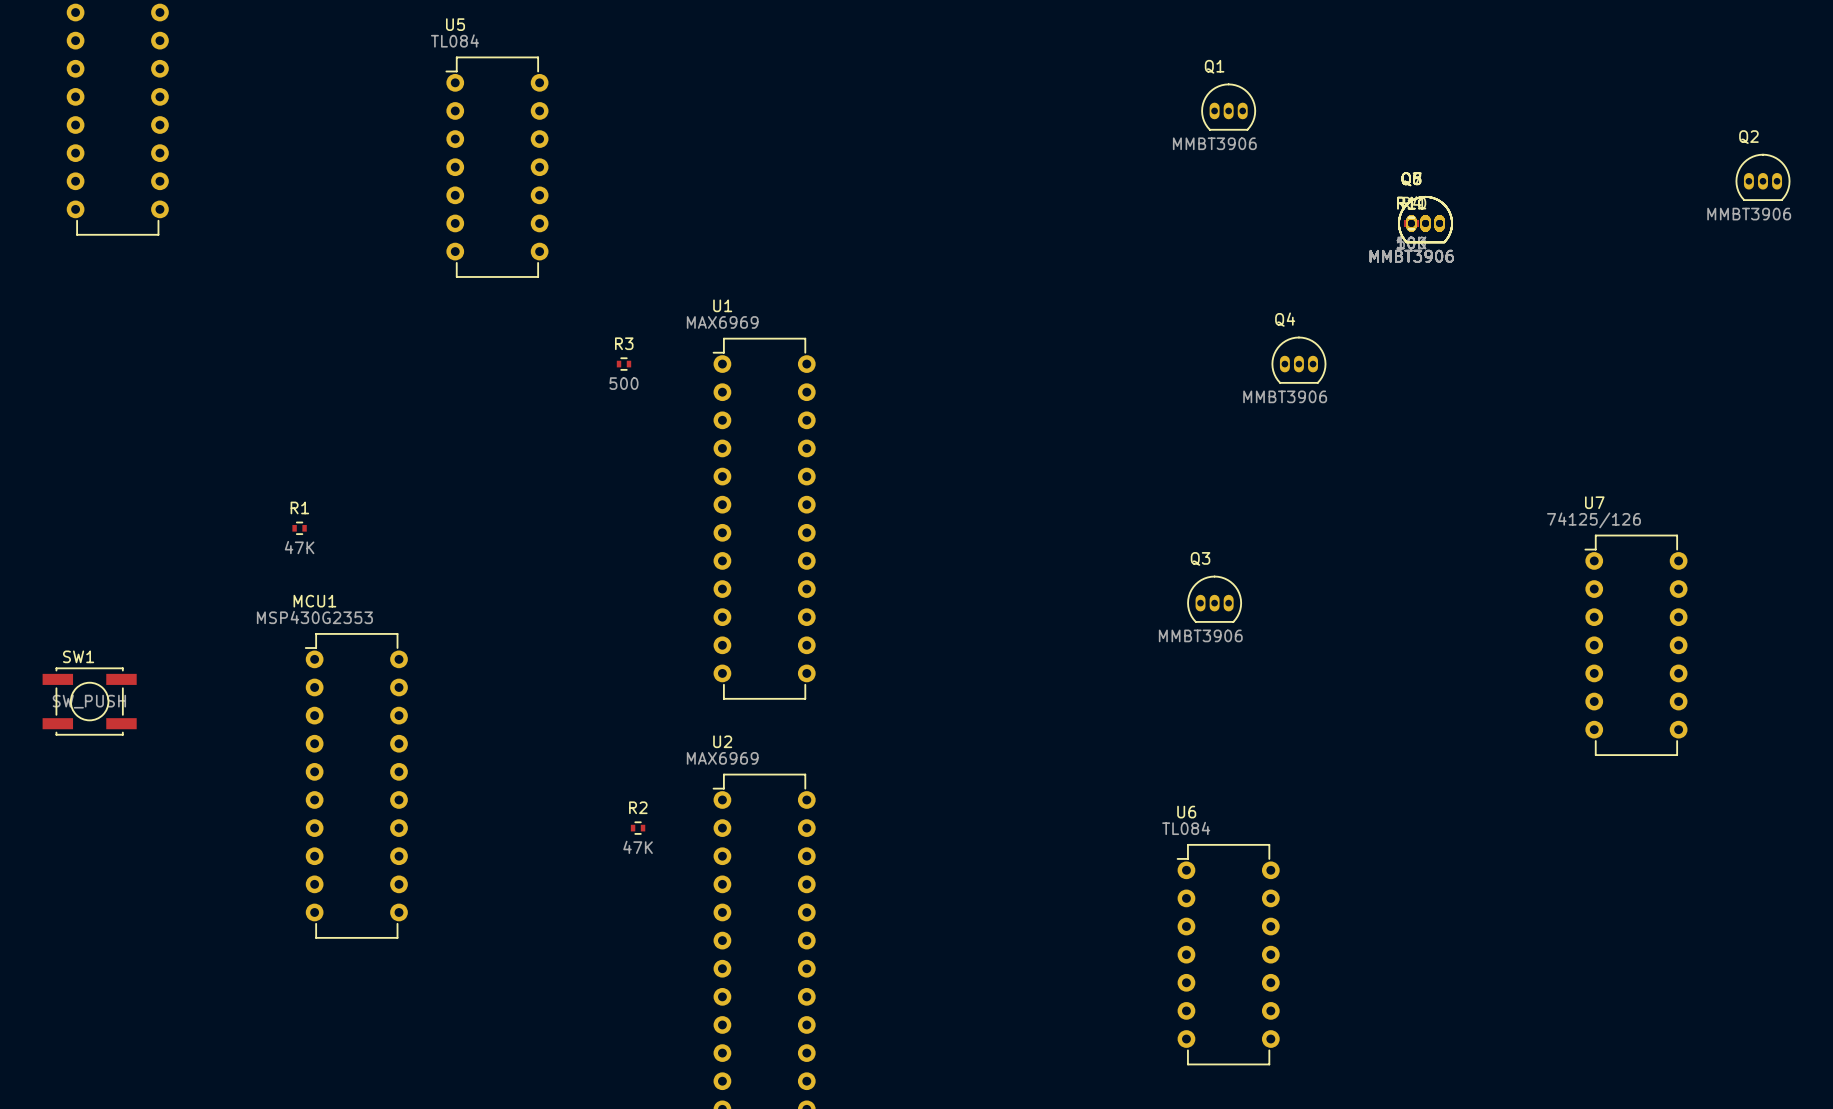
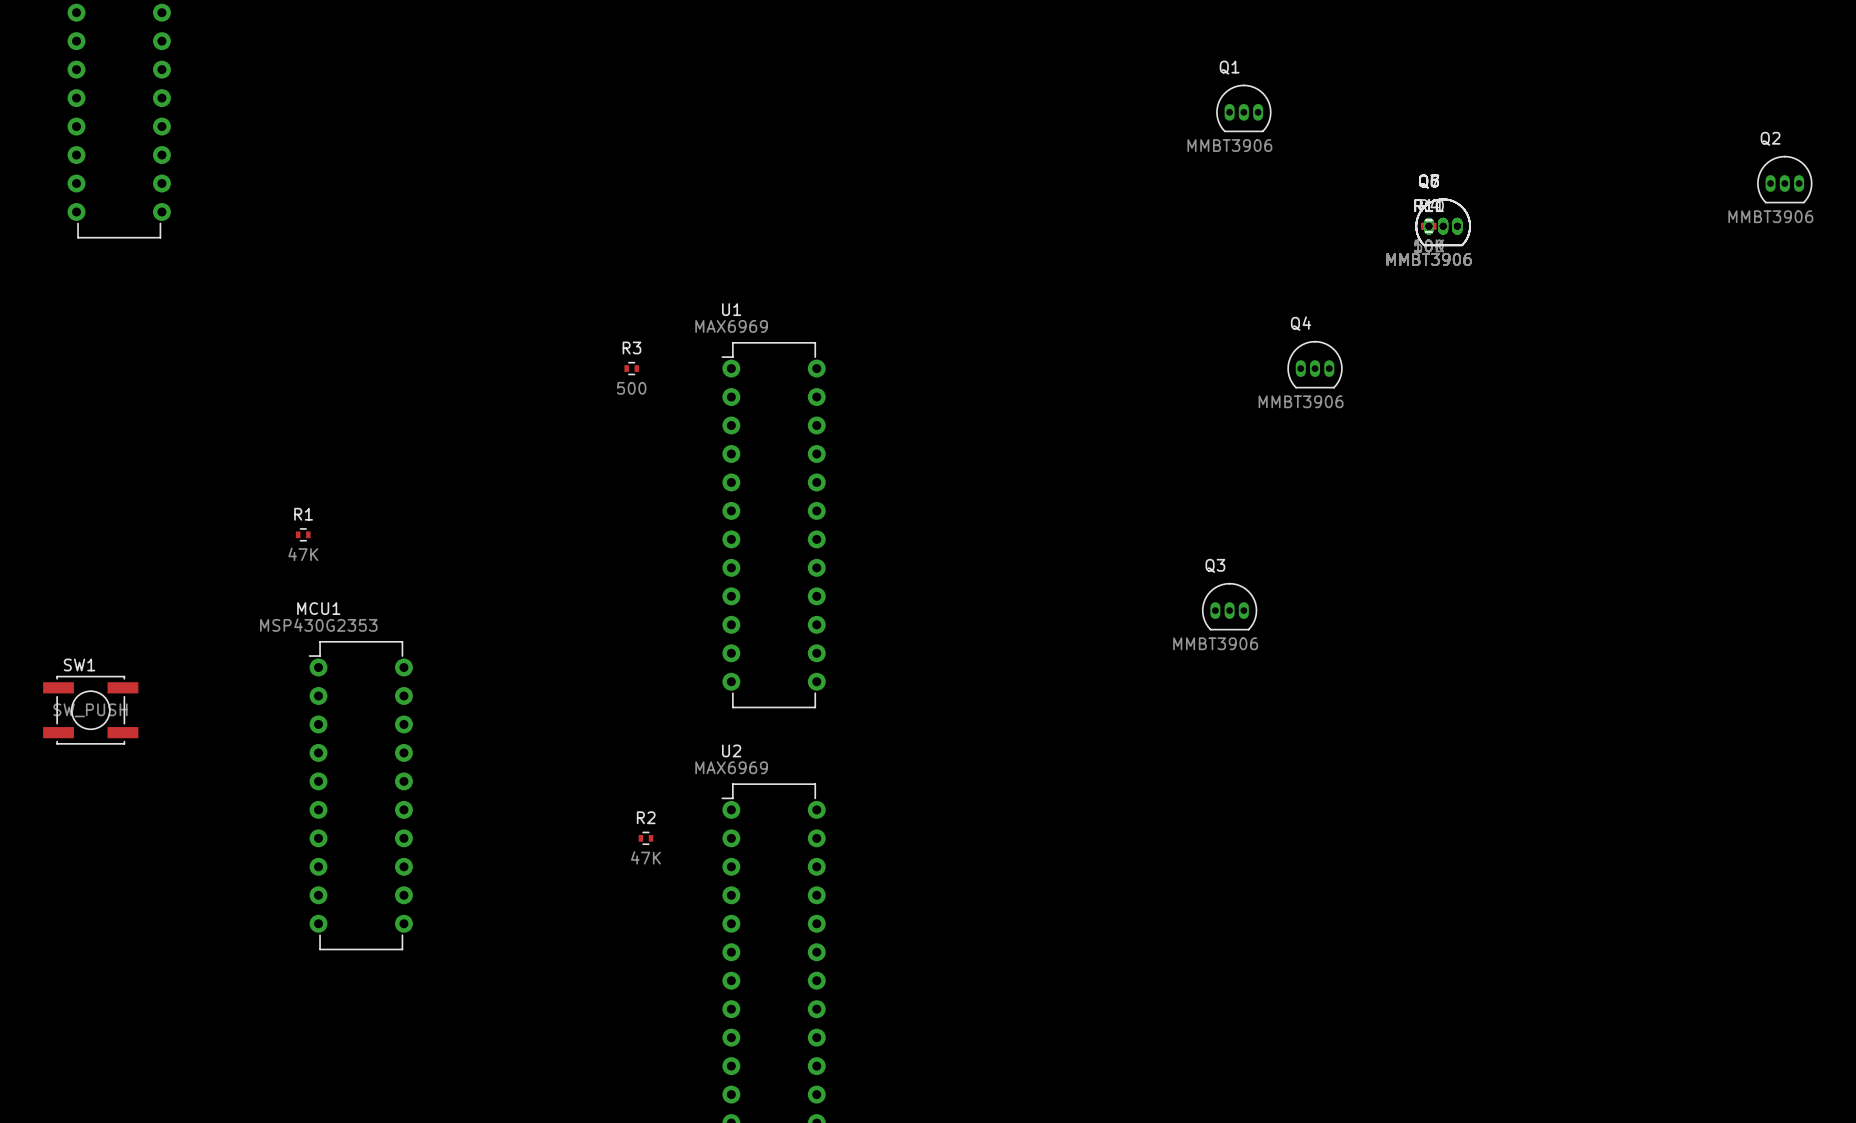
U5: TL084 (497, 167) -> none
U7: 74125/126 (1636, 645) -> none
U6: TL084 (1228, 954) -> none

